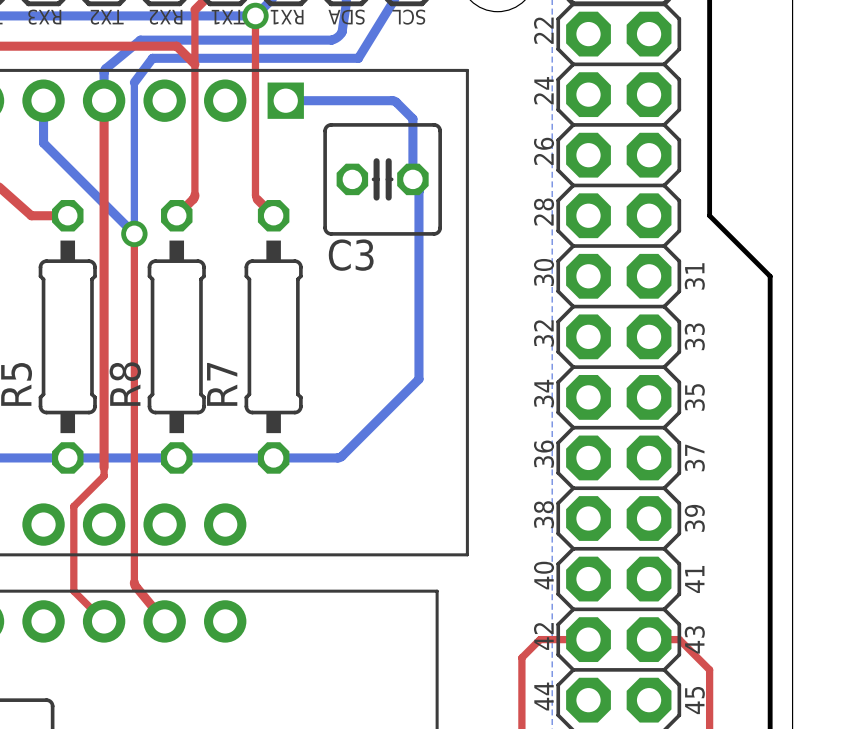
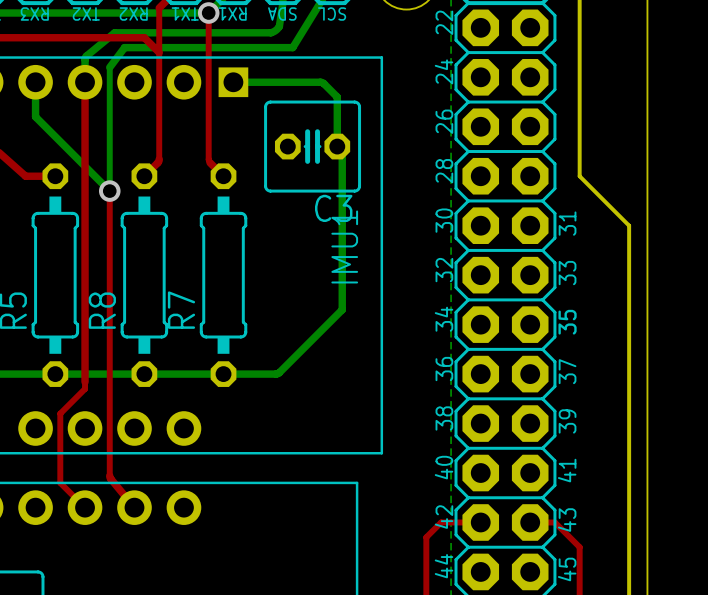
C3 name position: C3 (351, 255) -> C3 (333, 208)
IMU1 name: none -> IMU1 (344, 246)

